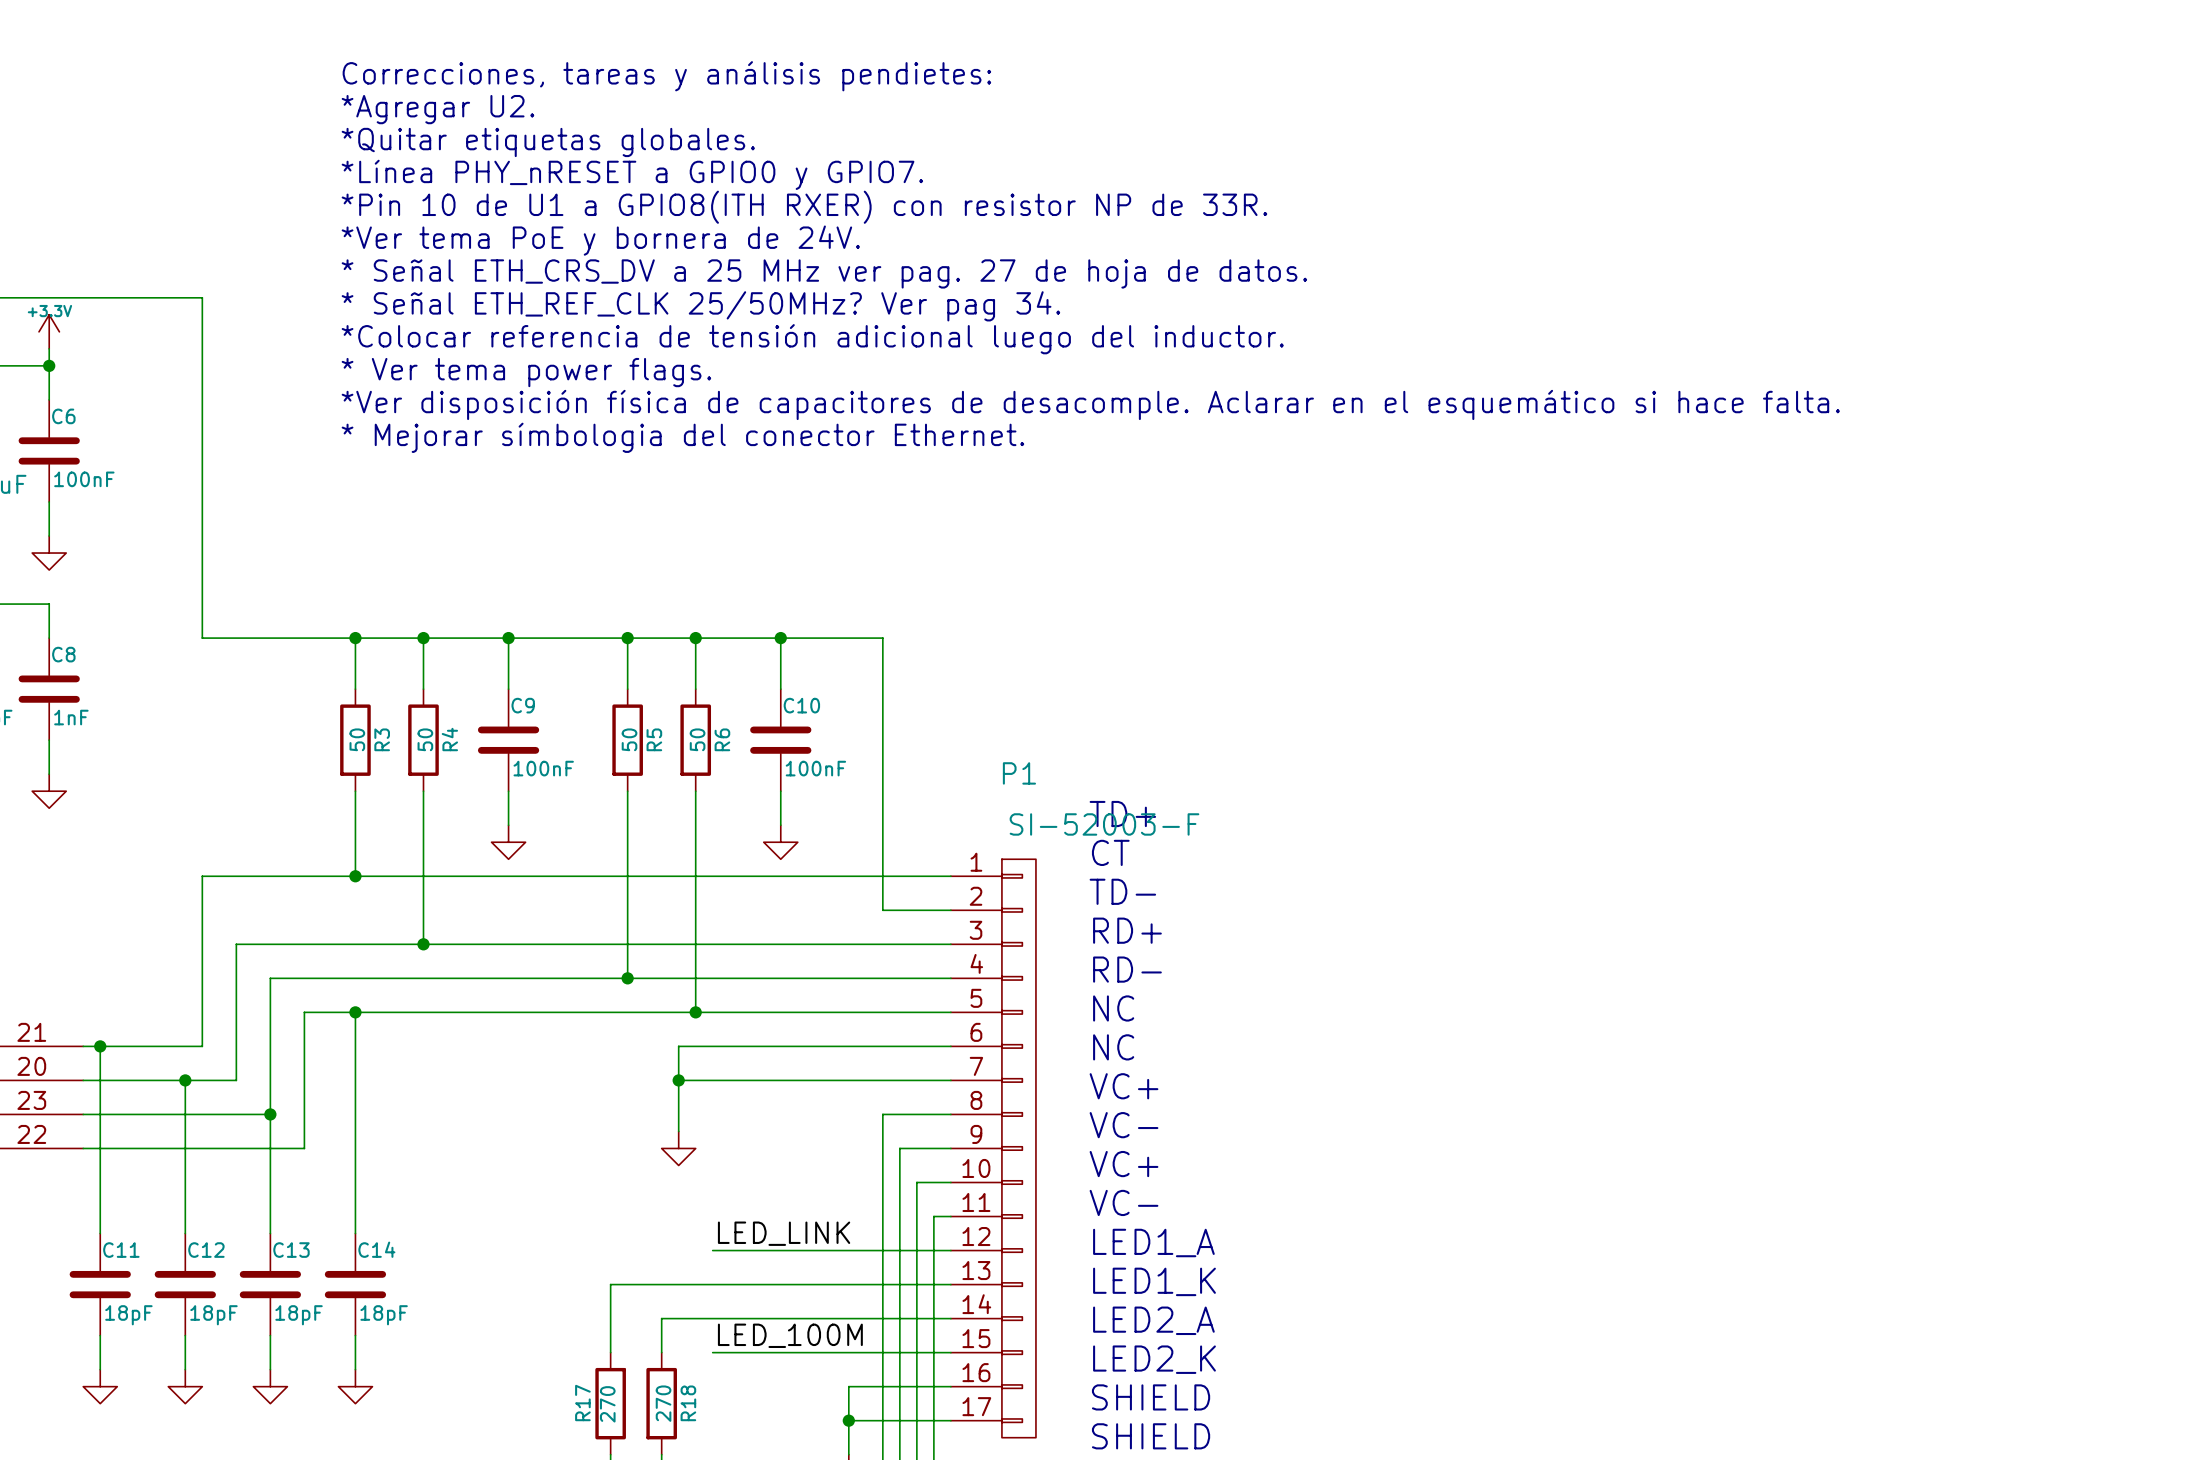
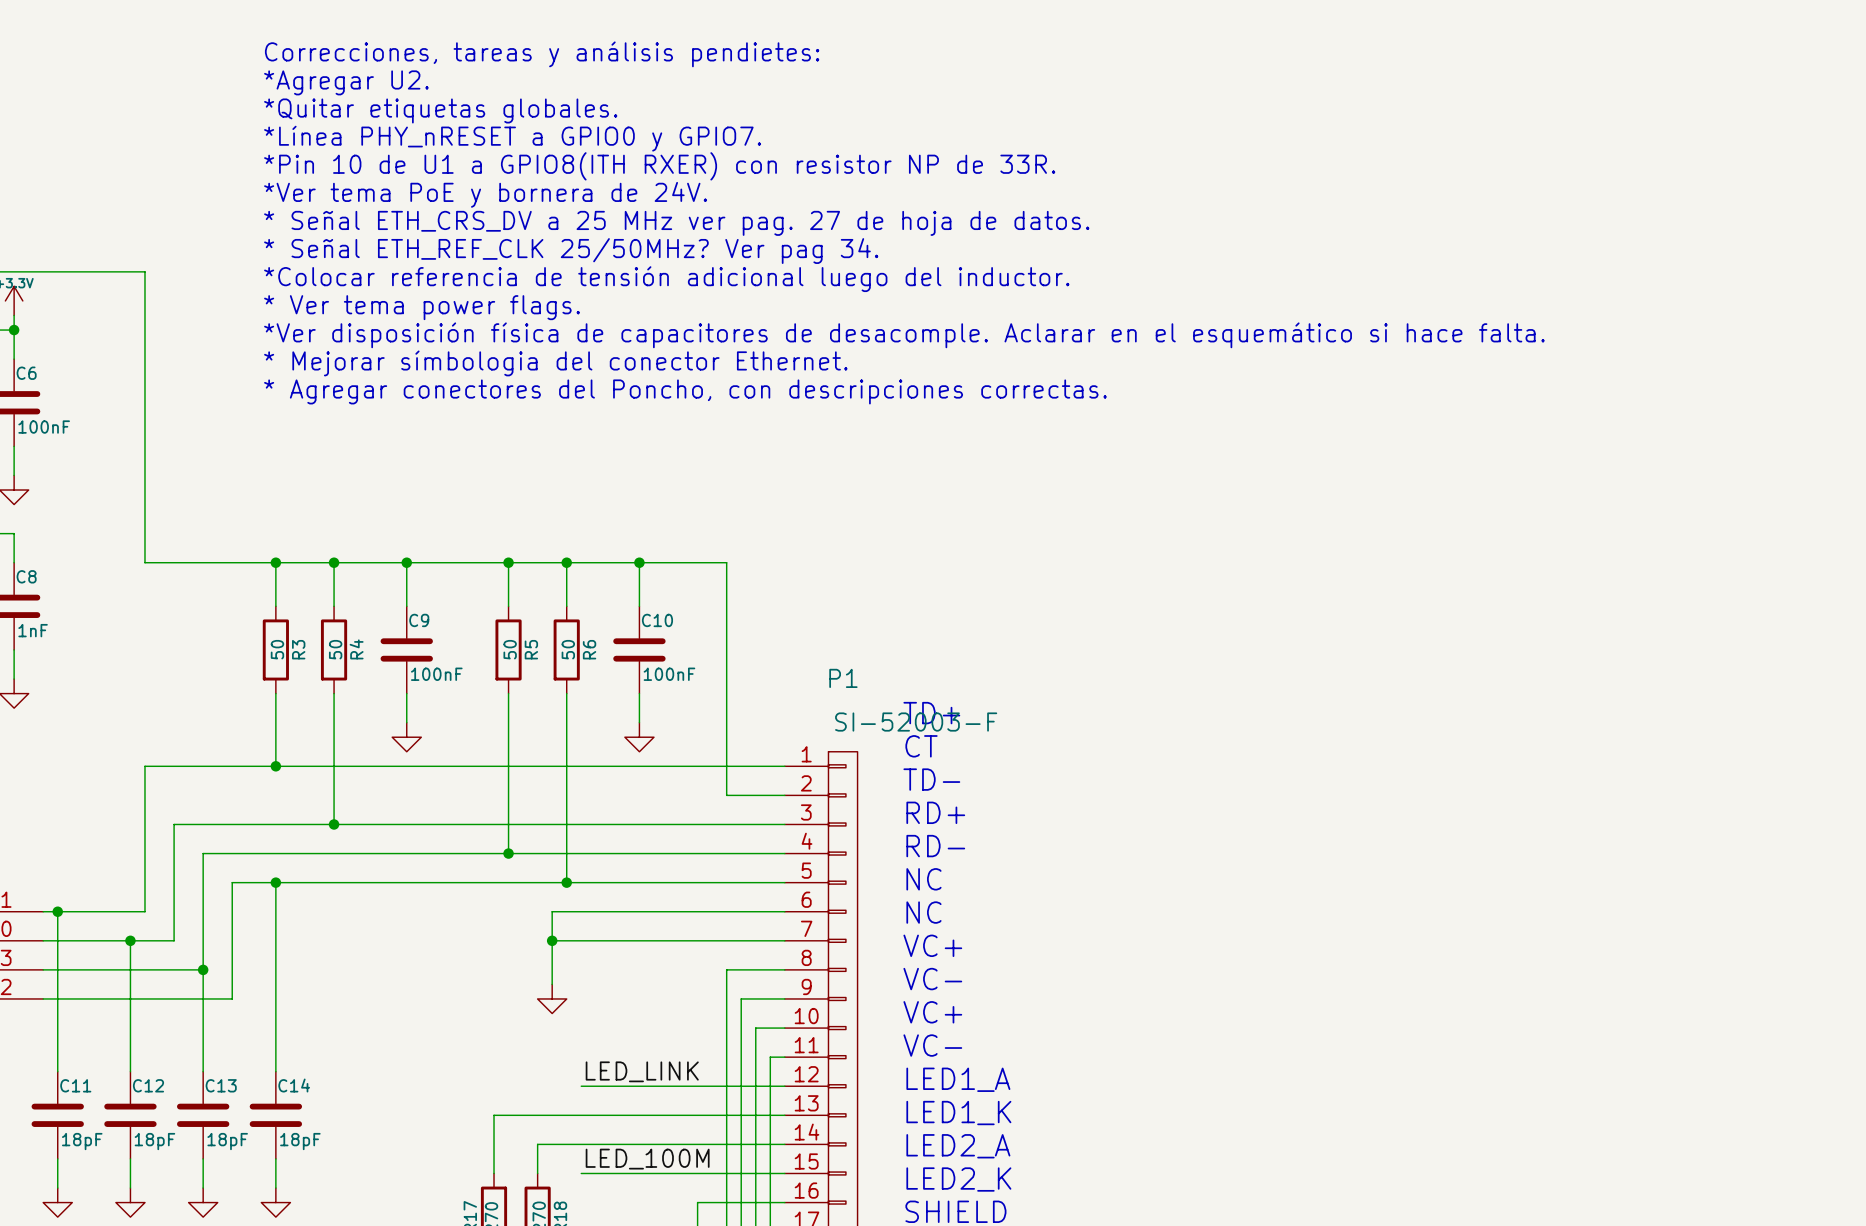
text: none -> Correcciones, tareas y análisis pendietes: (542, 54)
text: Correcciones, tareas y análisis pendietes: (666, 76) -> *Agregar U2. (346, 82)
text: *Agregar U2. (437, 109) -> *Quitar etiquetas globales. (440, 110)
text: *Quitar etiquetas globales. (548, 142) -> *Línea PHY_nRESET a GPIO0 y GPIO7. (512, 138)
text: *Línea PHY_nRESET a GPIO0 y GPIO7. (632, 174) -> *Pin 10 de U1 a GPIO8(ITH RXER) con resistor NP de 33R. (659, 166)
text: *Pin 10 de U1 a GPIO8(ITH RXER) con resistor NP de 33R. (804, 207) -> *Ver tema PoE y bornera de 24V. (485, 194)
text: *Ver tema PoE y bornera de 24V. (600, 240) -> * Señal ETH_CRS_DV a 25 MHz ver pag. 27 de hoja de datos. (676, 223)
text: * Señal ETH_CRS_DV a 25 MHz ver pag. 27 de hoja de datos. (824, 273) -> * Señal ETH_REF_CLK 25/50MHz? Ver pag 34. (571, 251)
text: * Señal ETH_REF_CLK 25/50MHz? Ver pag 34. (700, 306) -> *Colocar referencia de tensión adicional luego del inductor. (666, 279)
text: *Colocar referencia de tensión adicional luego del inductor. (812, 339) -> * Ver tema power flags. (422, 307)
text: * Ver tema power flags. (526, 372) -> *Ver disposición física de capacitores de desacomple. Aclarar en el esquemático si hace falta. (904, 335)
text: *Ver disposición física de capacitores de desacomple. Aclarar en el esquemático si hace falta. (1090, 404) -> * Mejorar símbologia del conector Ethernet. (555, 363)
text: * Mejorar símbologia del conector Ethernet. (682, 437) -> * Agregar conectores del Poncho, con descripciones correctas. (685, 391)

